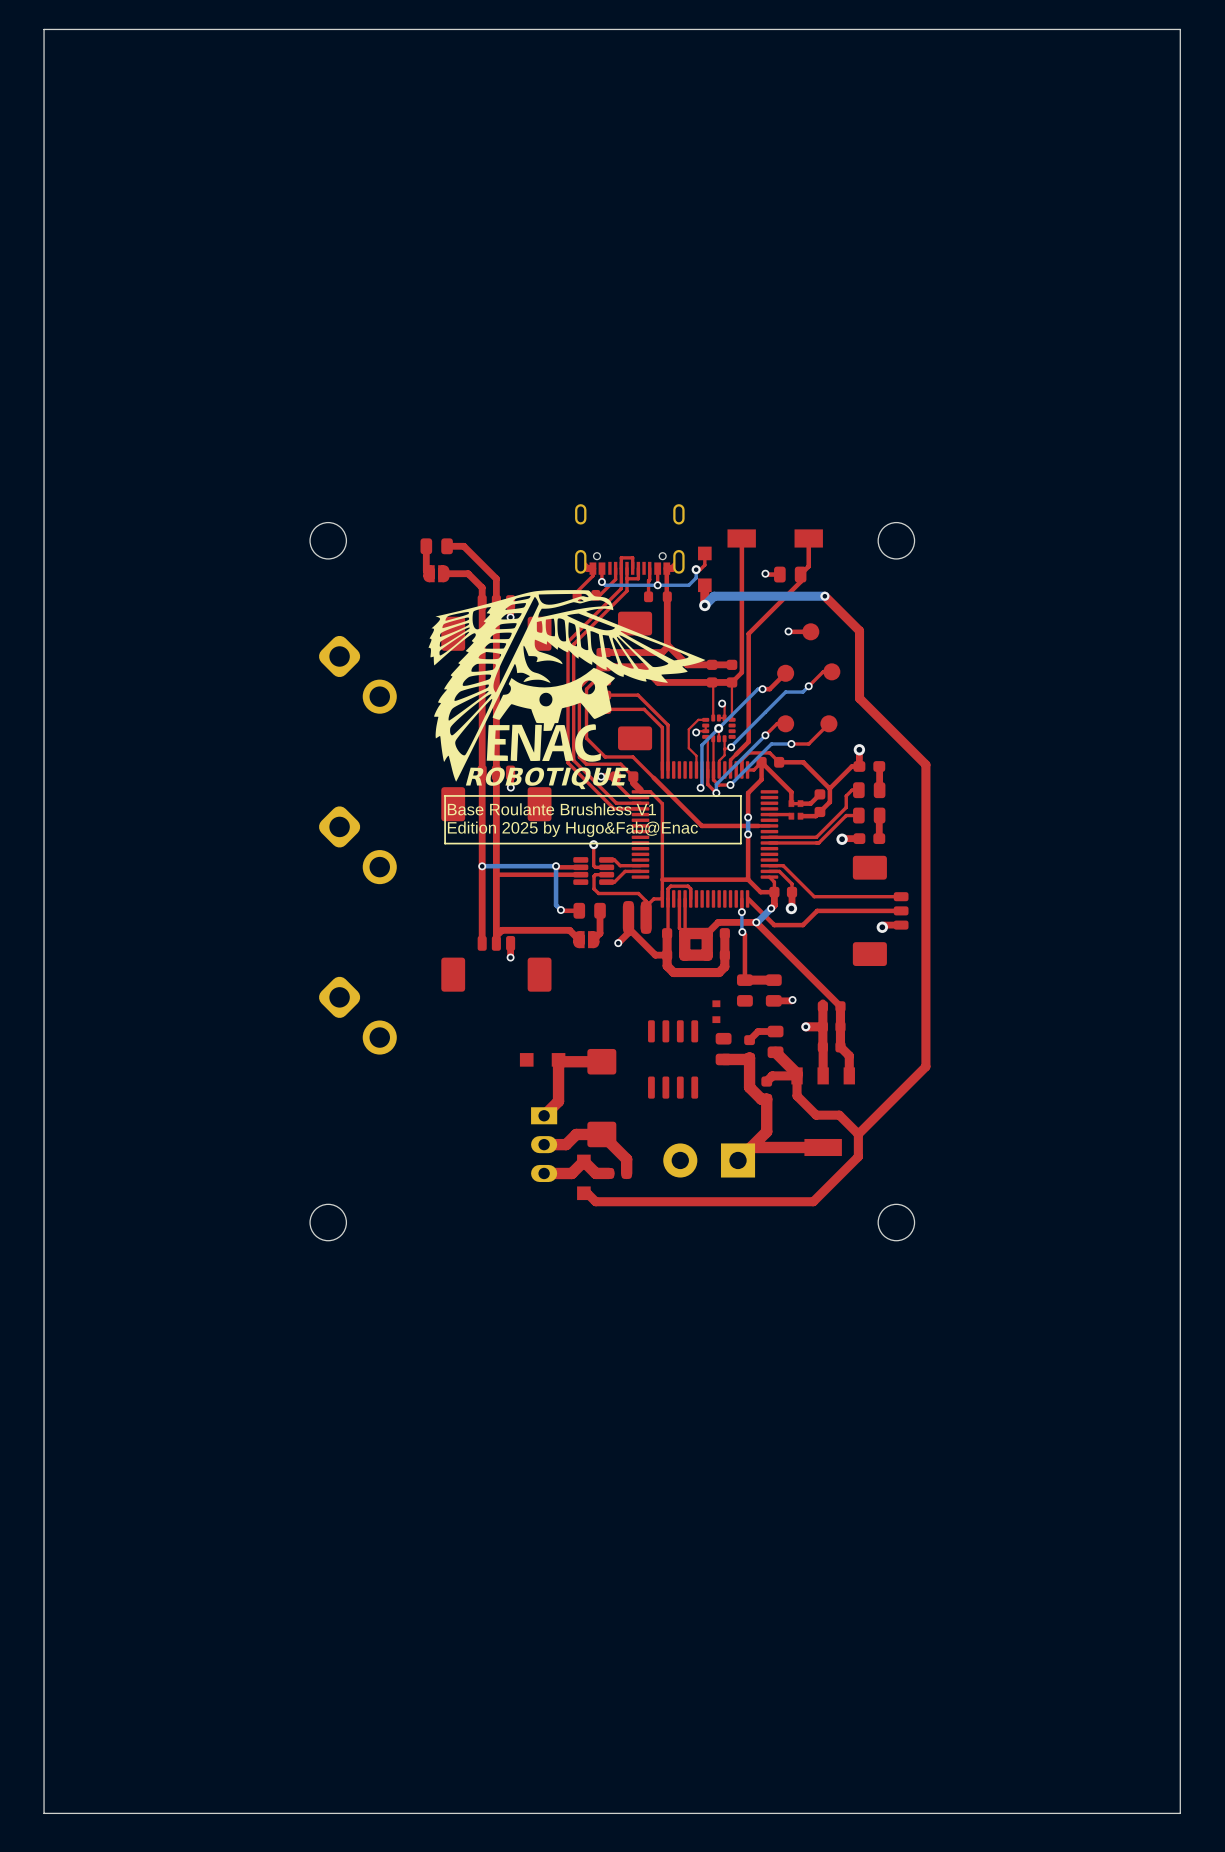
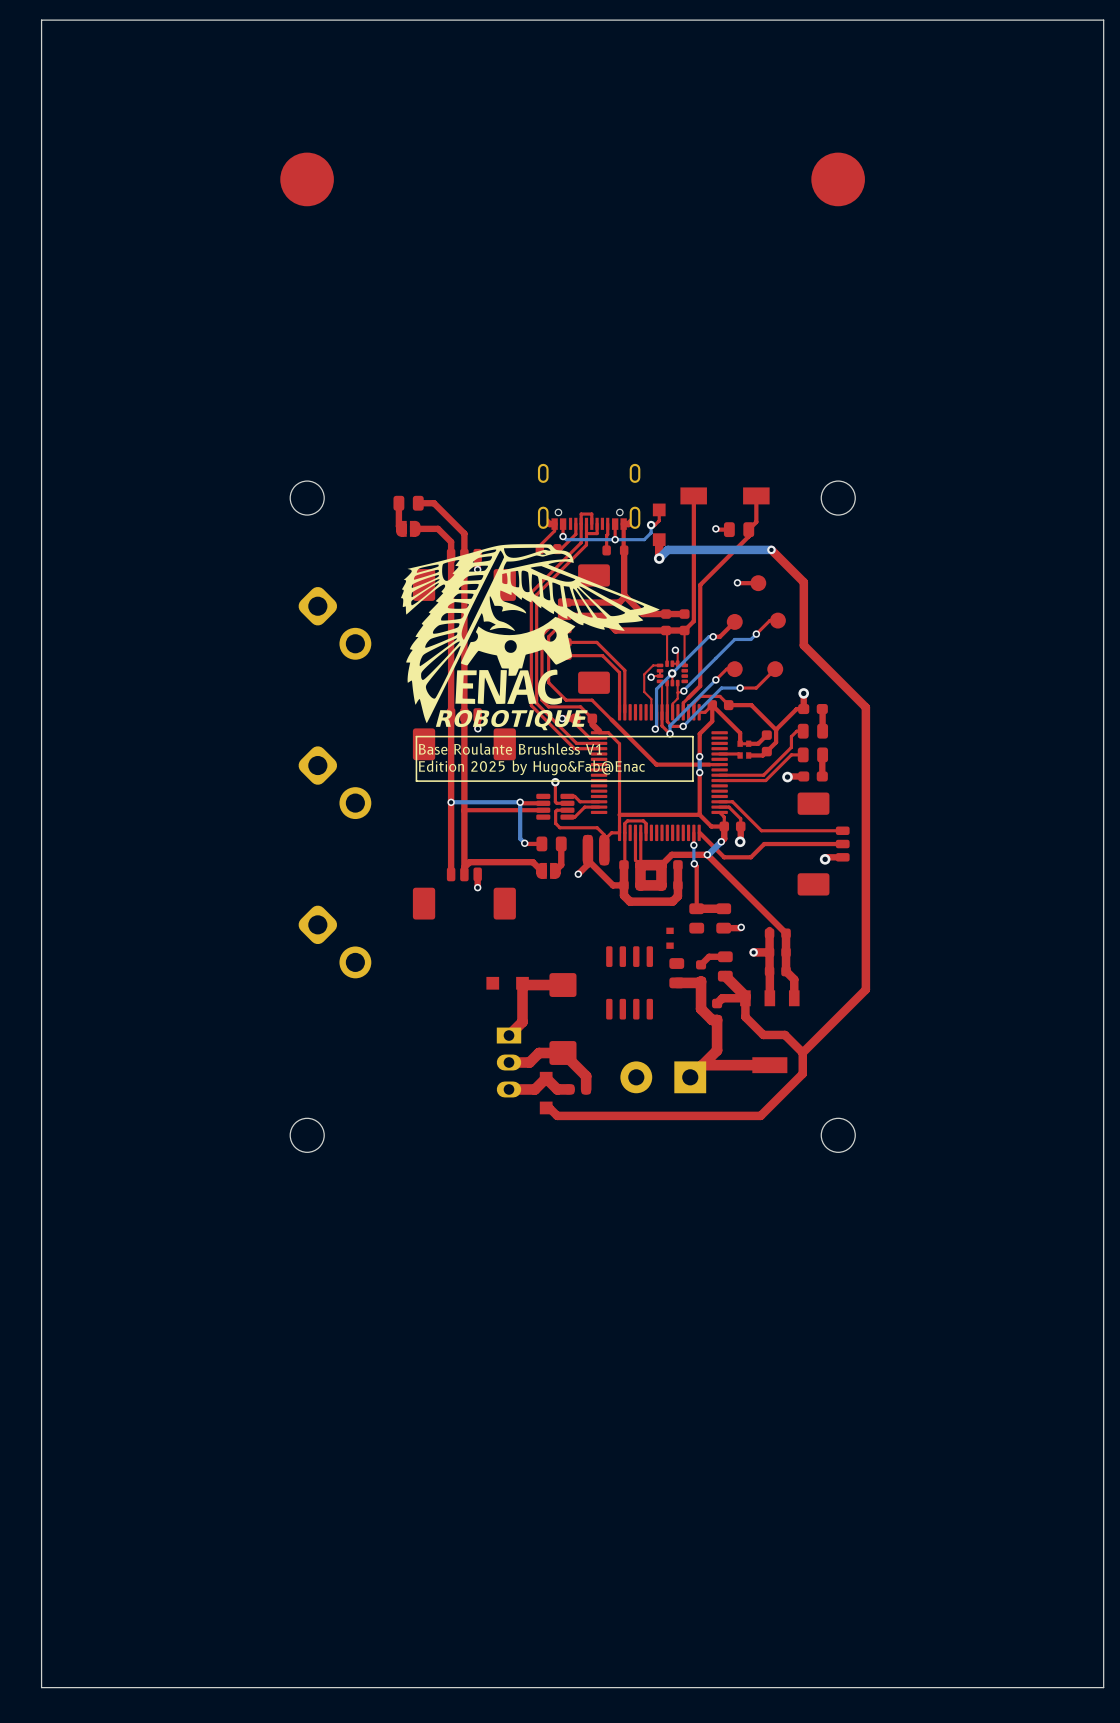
part: none -> (307, 179)
part: none -> (838, 179)

